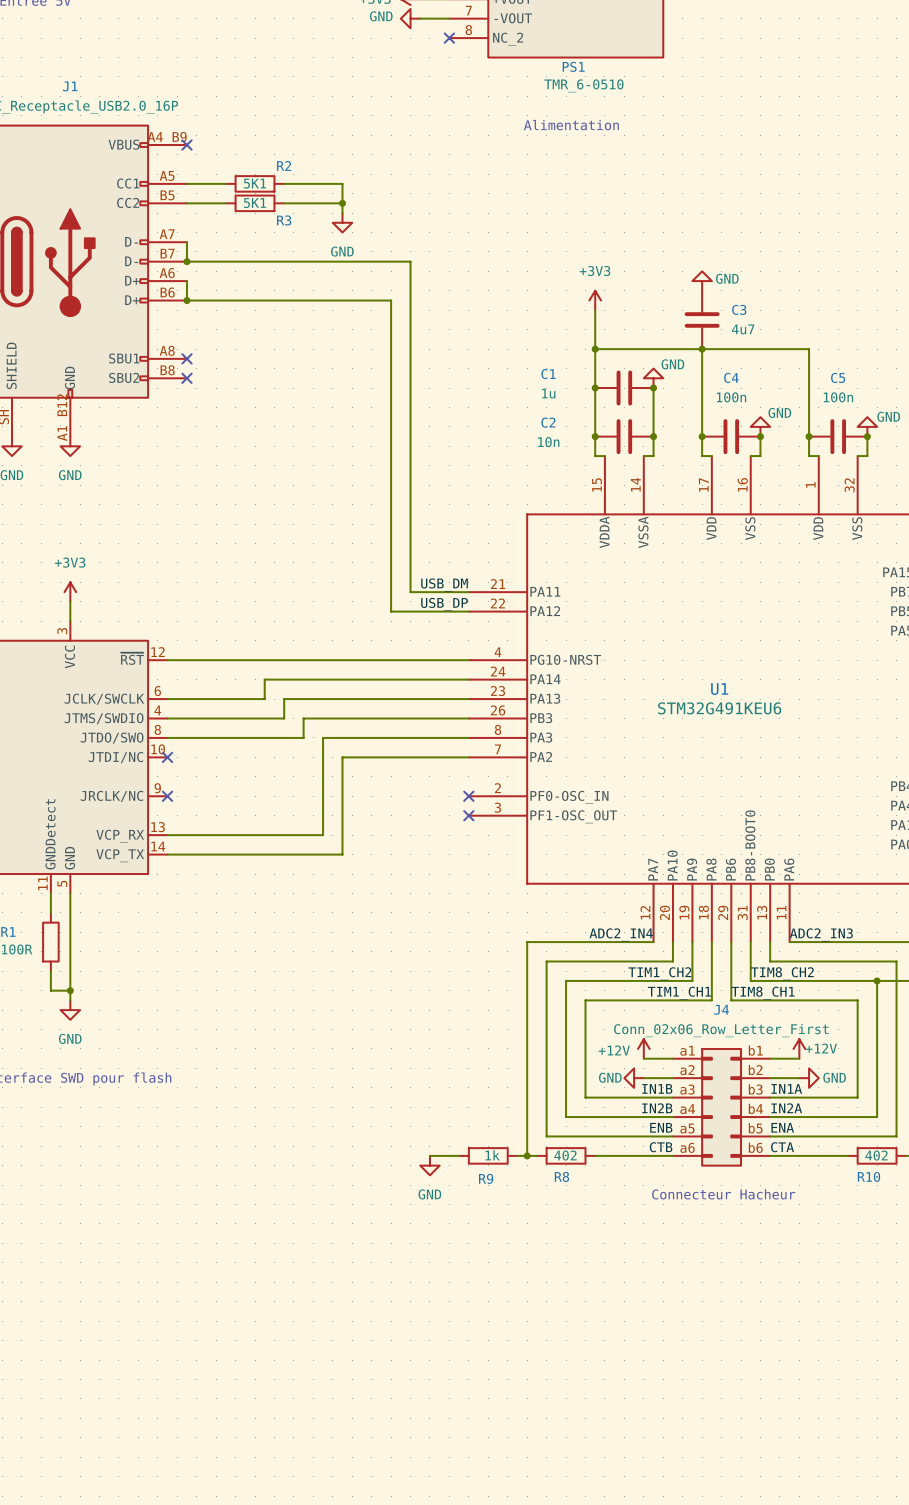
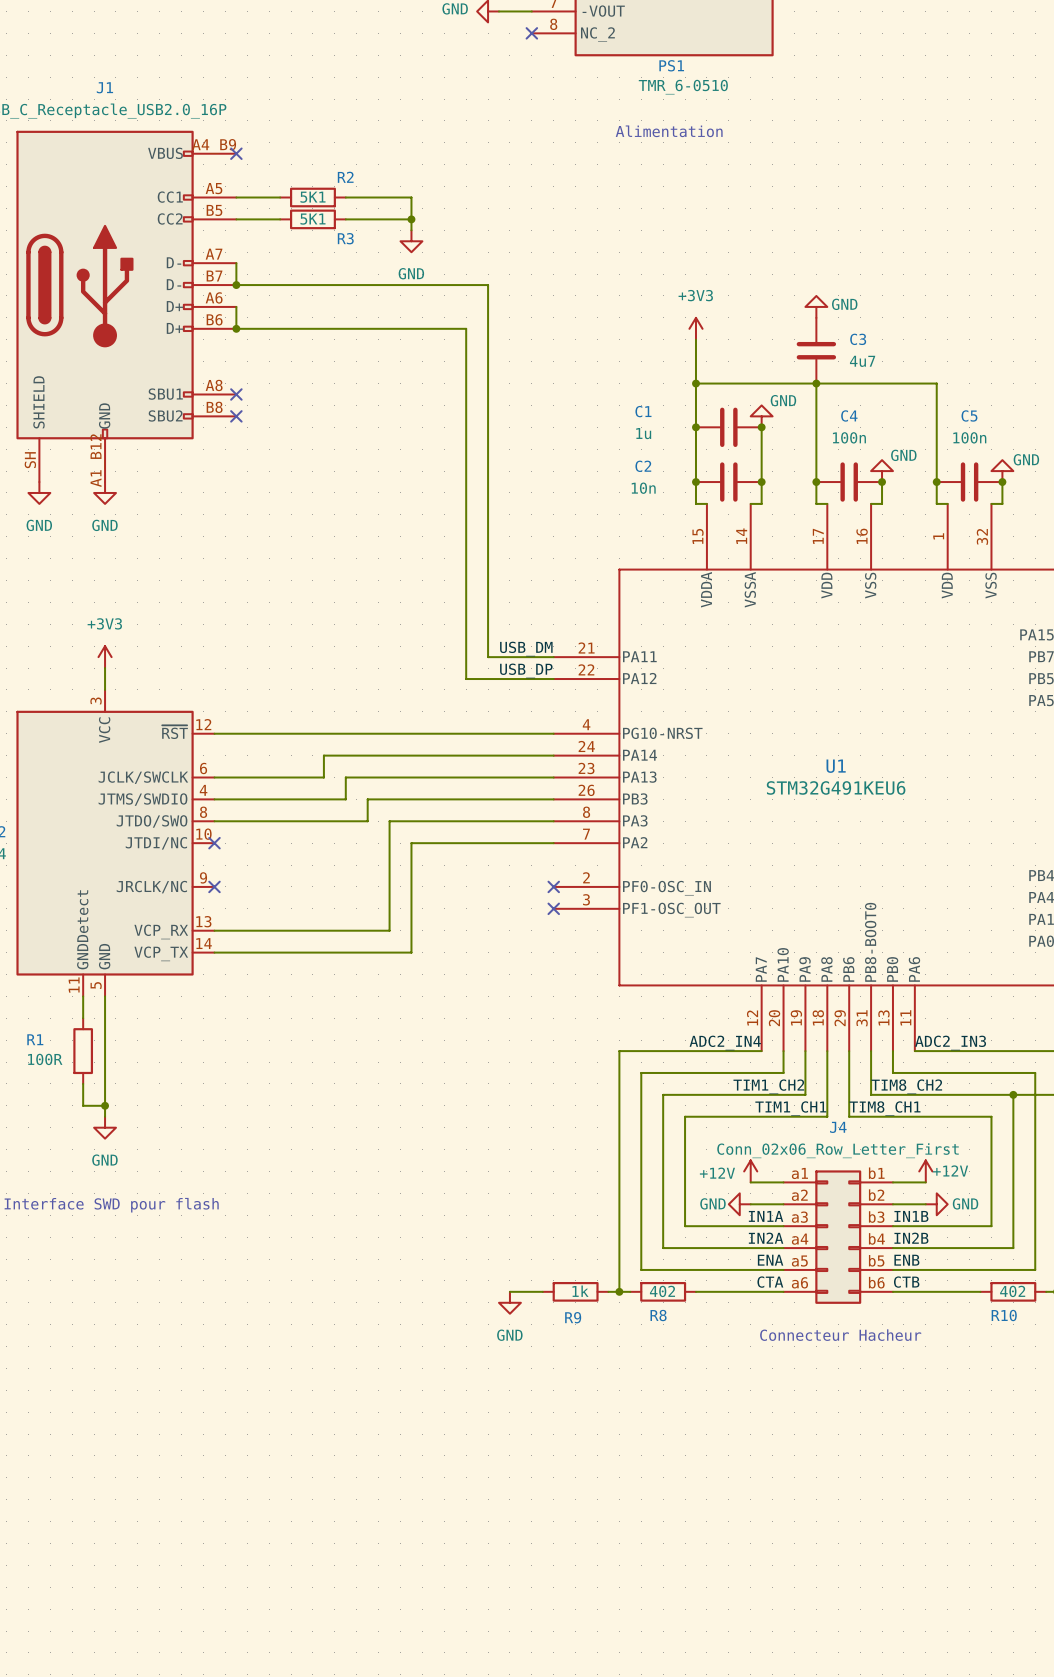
label: IN1B (657, 1088) -> IN1A (766, 1216)
label: IN1A (786, 1088) -> IN1B (911, 1216)
label: IN2B (657, 1108) -> IN2A (766, 1238)
label: IN2A (786, 1108) -> IN2B (911, 1238)
label: ENB (661, 1127) -> ENA (770, 1260)
label: ENA (782, 1127) -> ENB (906, 1260)
label: CTB (661, 1147) -> CTA (770, 1282)
label: CTA (782, 1147) -> CTB (906, 1282)

